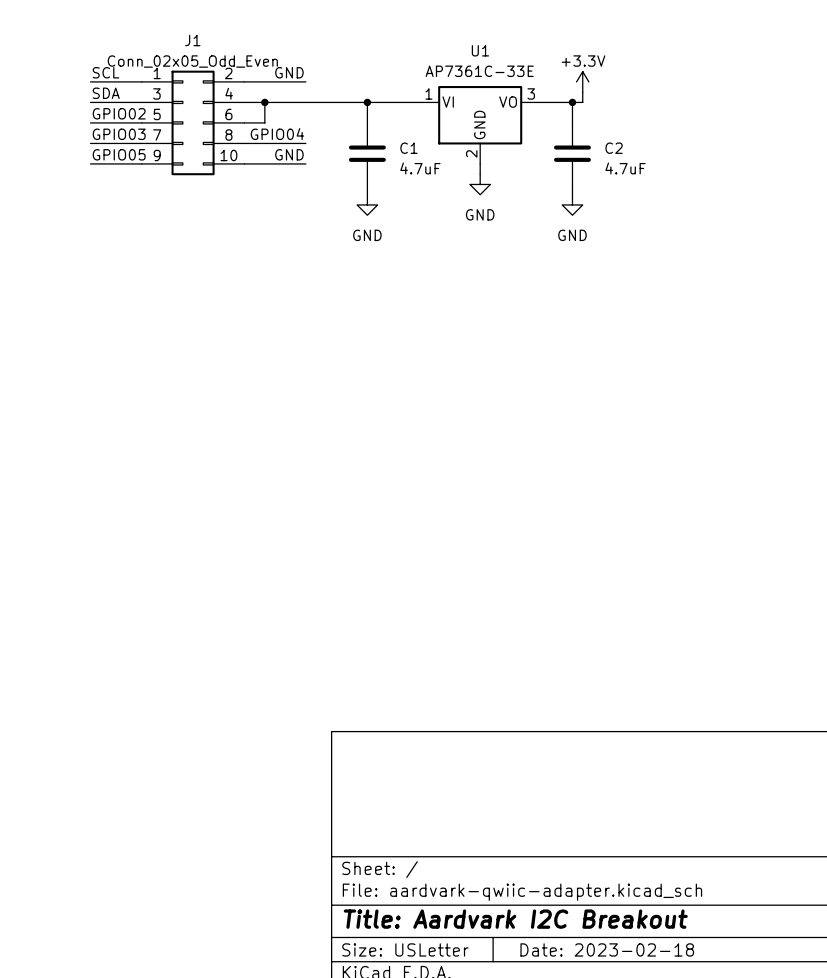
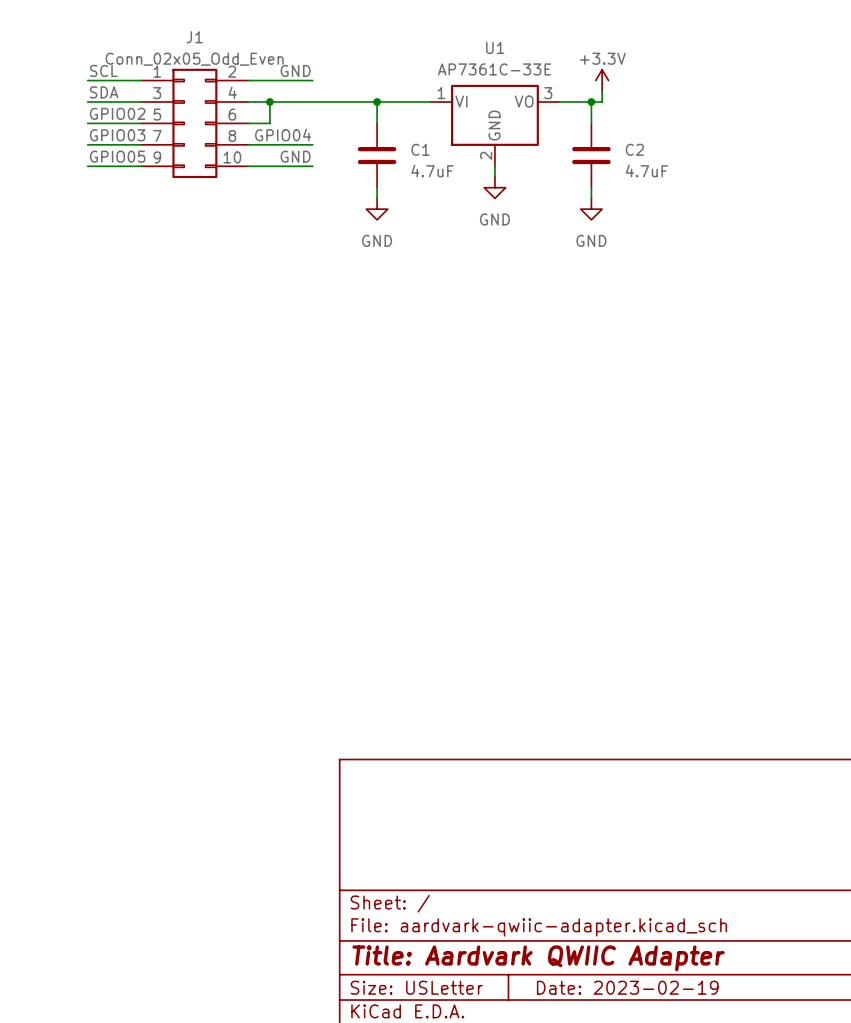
title block: Title: Aardvark I2C Breakout (515, 919) -> Title: Aardvark QWIIC Adapter (538, 958)
title block: Date: 2023-02-18 (607, 949) -> Date: 2023-02-19 (627, 987)

